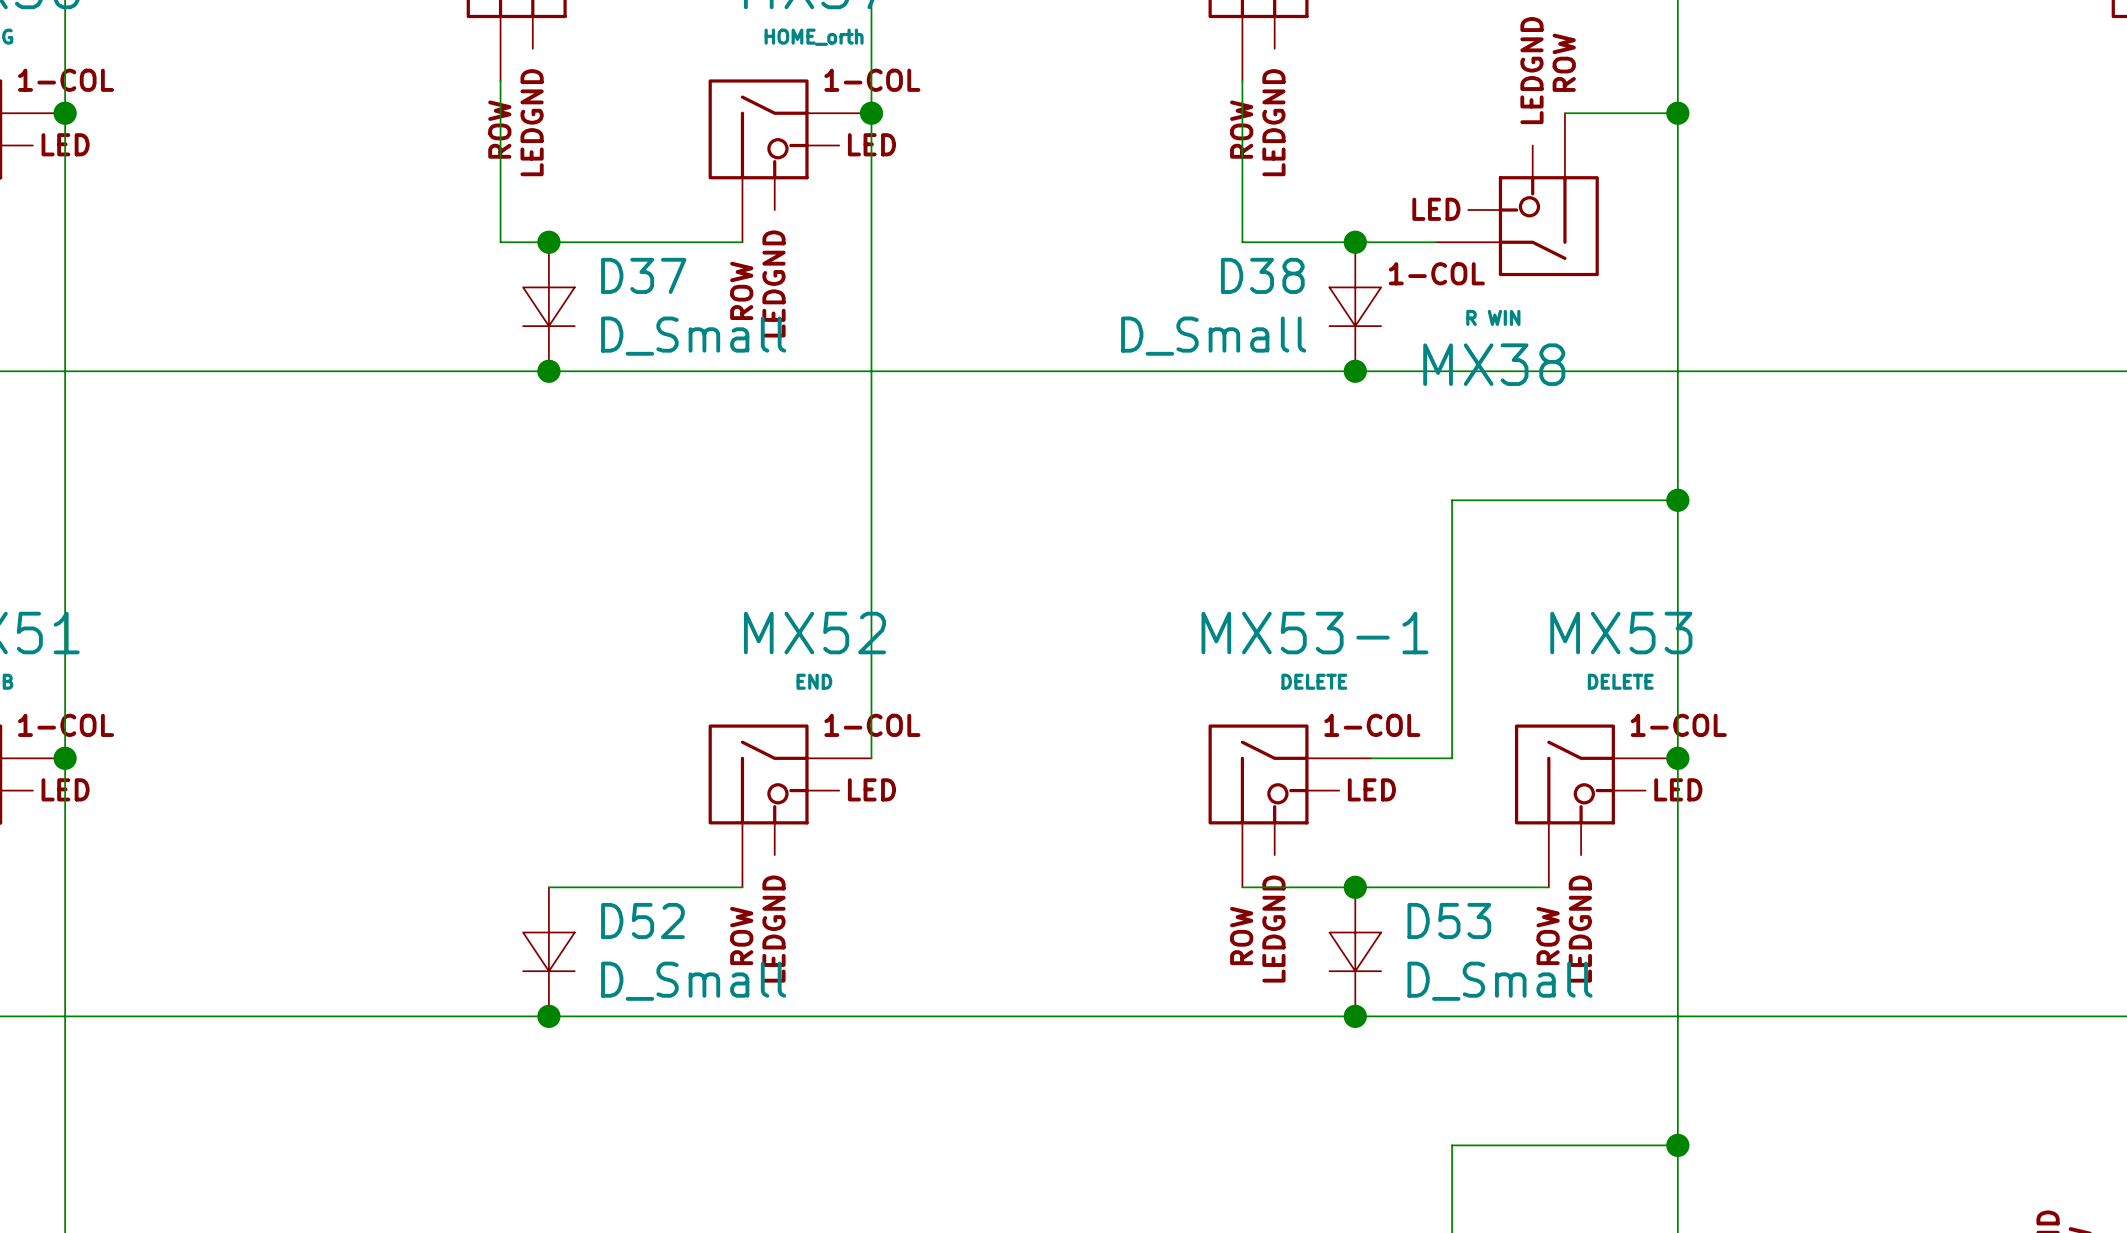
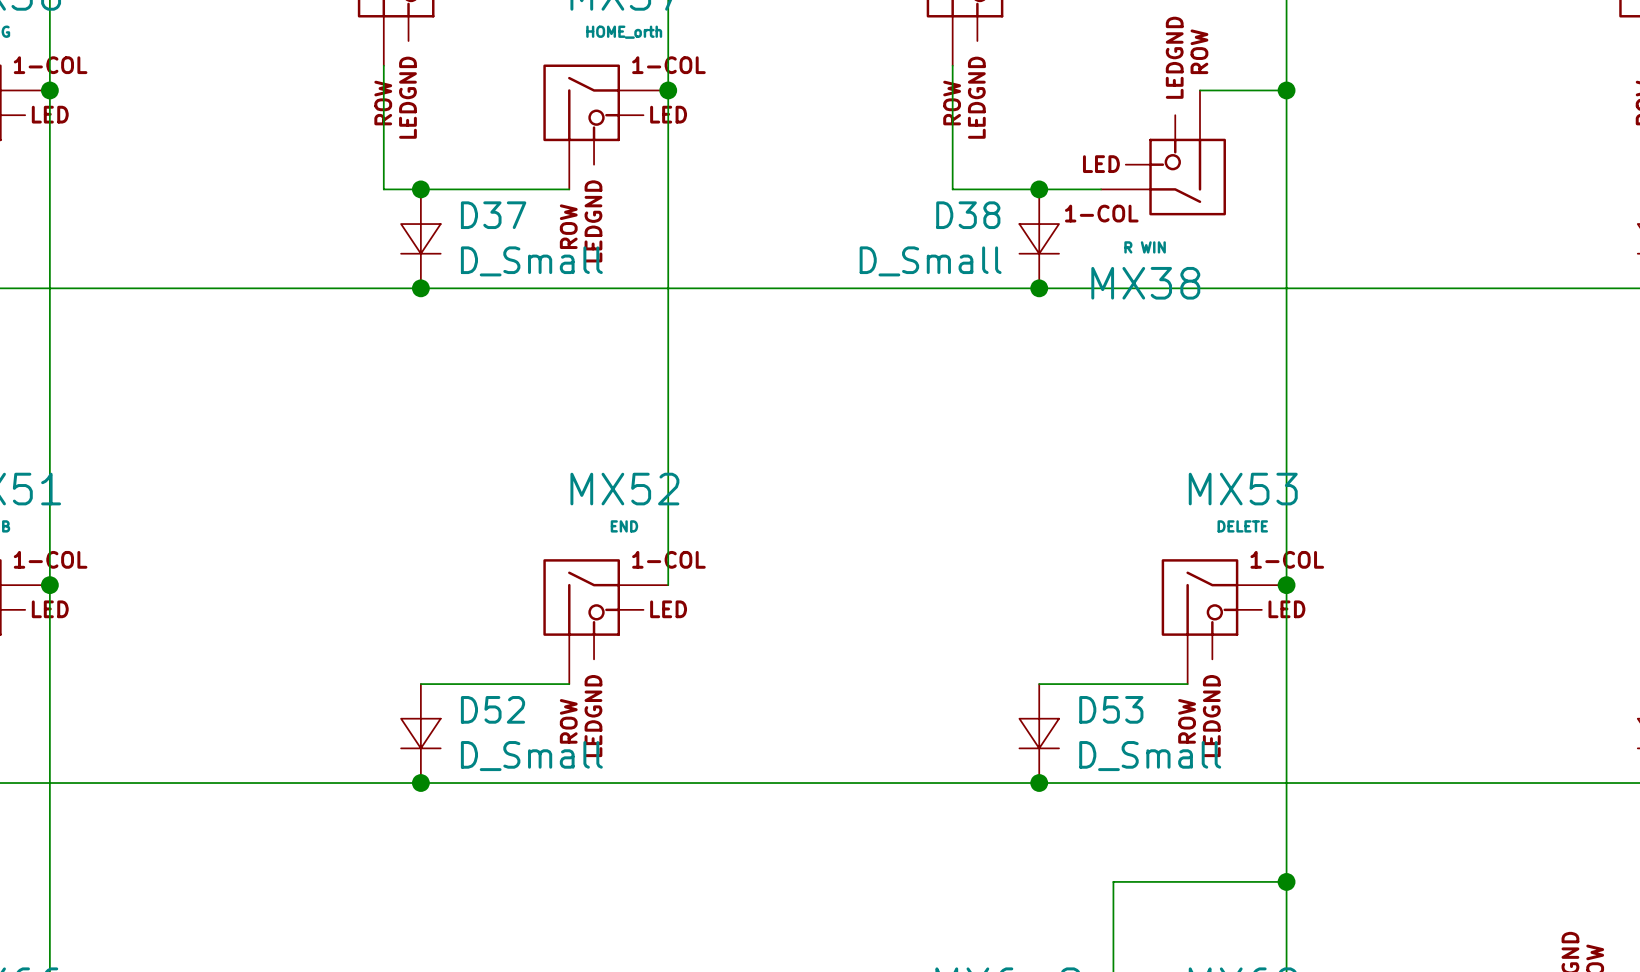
wire: (1677, 500) (1452, 500) (1452, 758) (1371, 758) -> none
junction: (1677, 500) -> none
MX53-1: DELETE (1289, 805) -> none
wire: (1242, 887) (1355, 887) -> none
junction: (1355, 887) -> none

